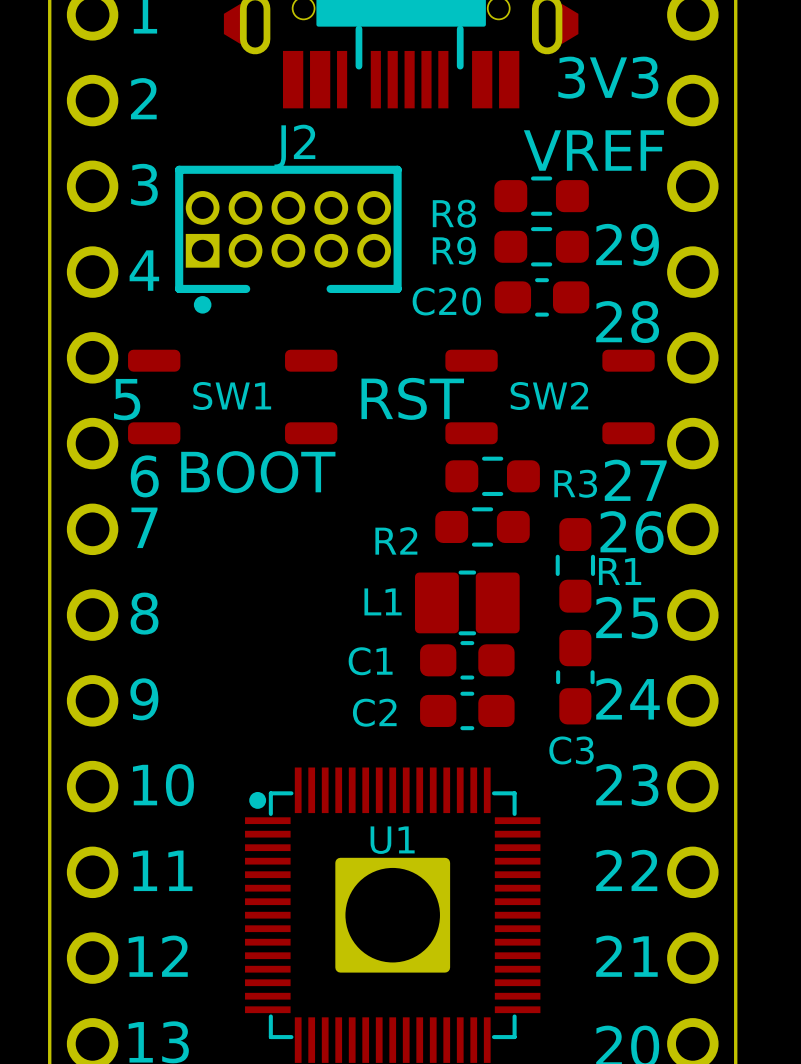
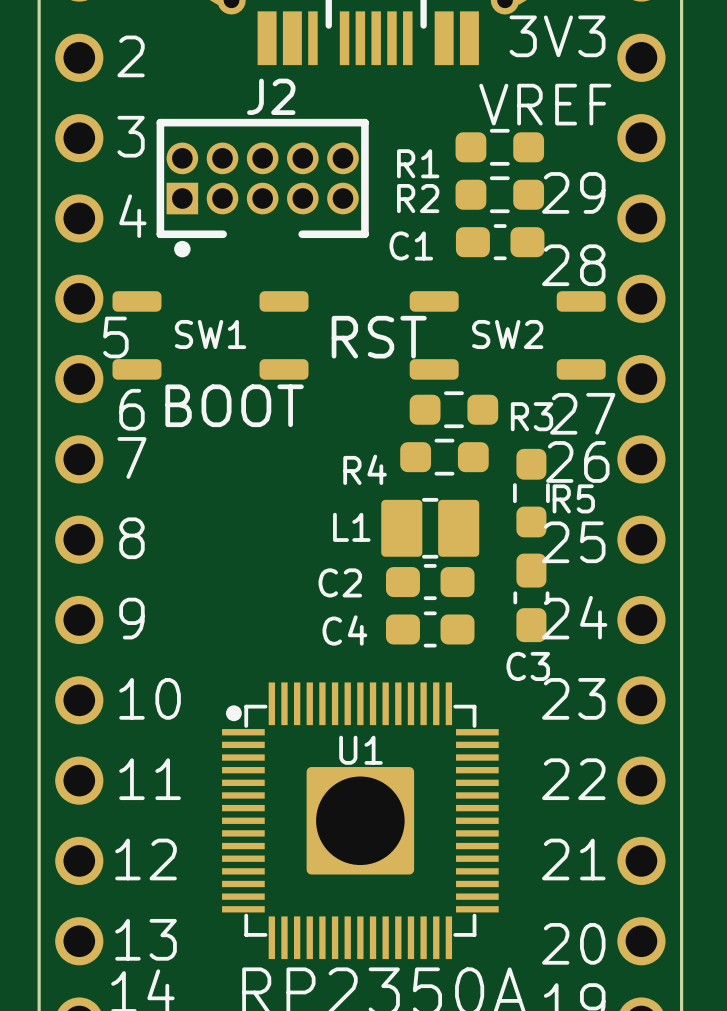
R8 name: R8 (454, 213) -> R1 (418, 163)
R9 name: R9 (454, 250) -> R2 (418, 198)
C20 name: C20 (446, 301) -> C1 (411, 245)
R2 name: R2 (396, 540) -> R4 (365, 469)
R1 name: R1 (620, 571) -> R5 (573, 498)
C1 name: C1 (370, 661) -> C2 (340, 582)
C2 name: C2 (374, 712) -> C4 (344, 630)

